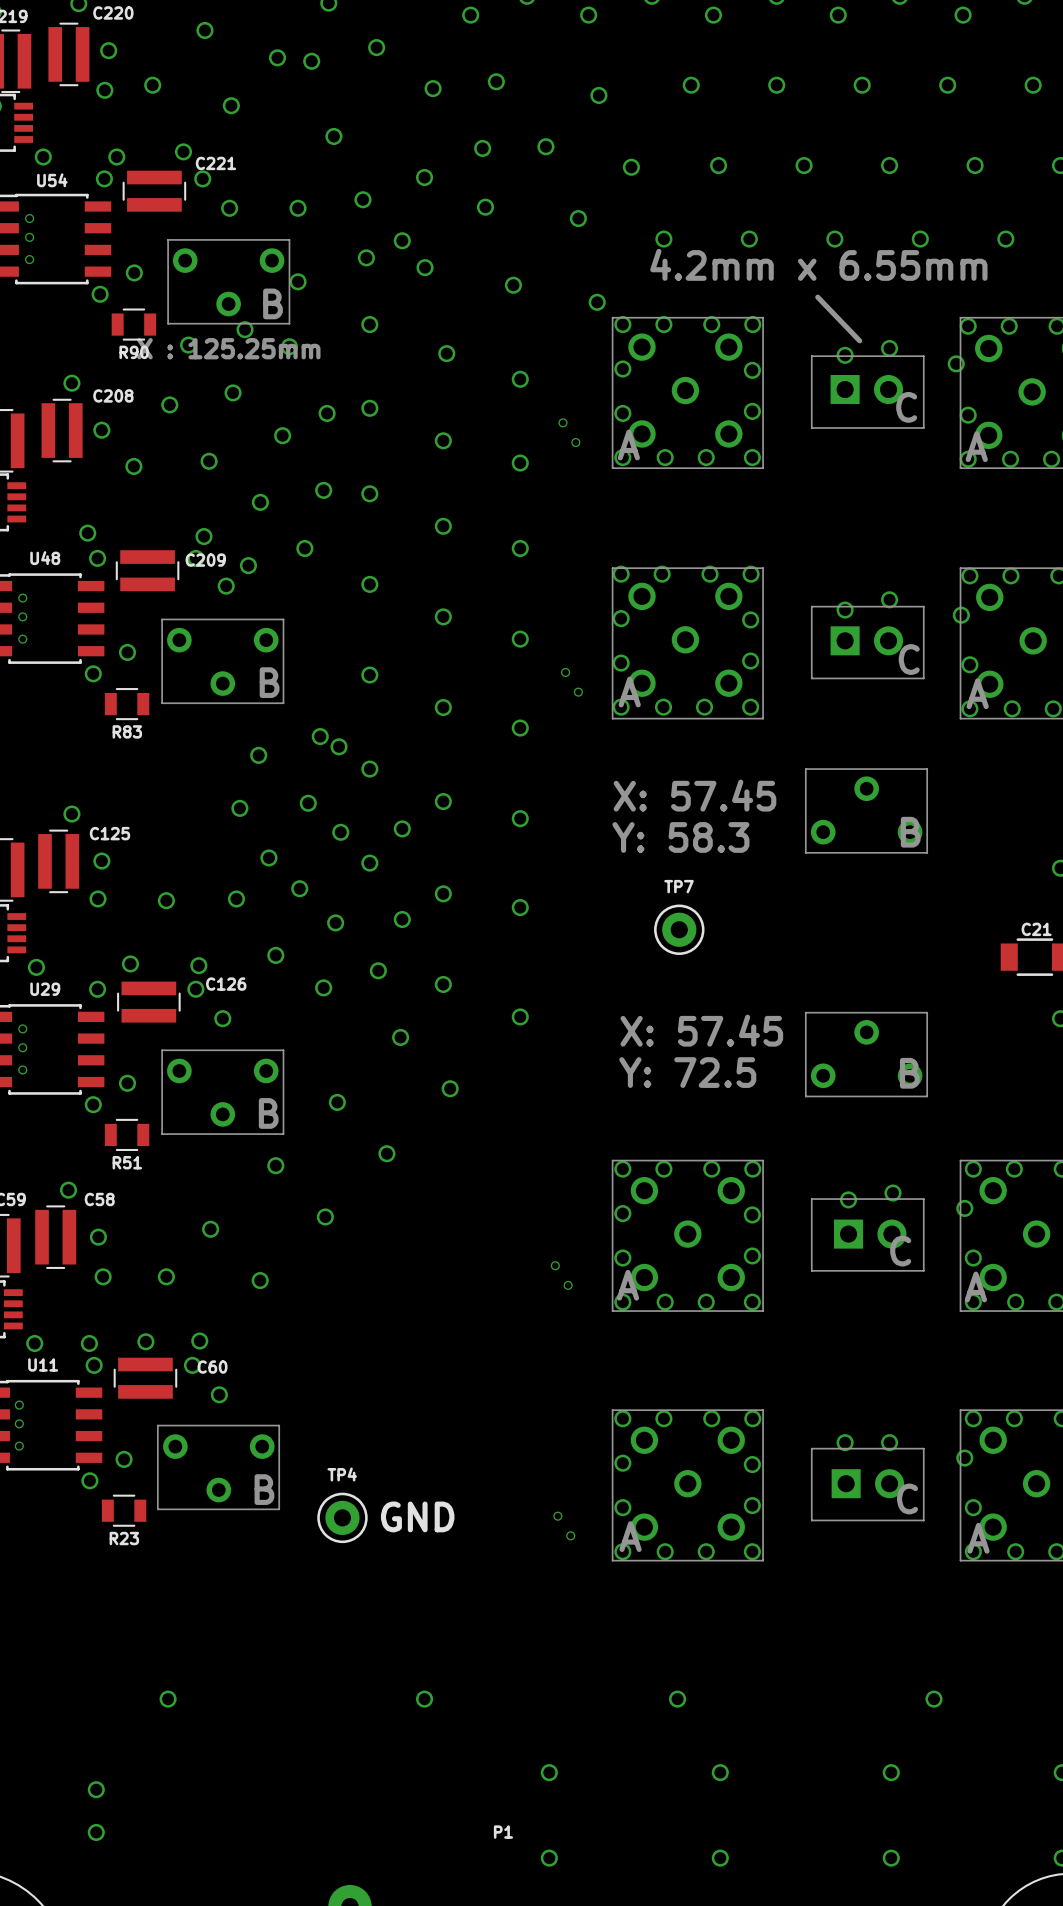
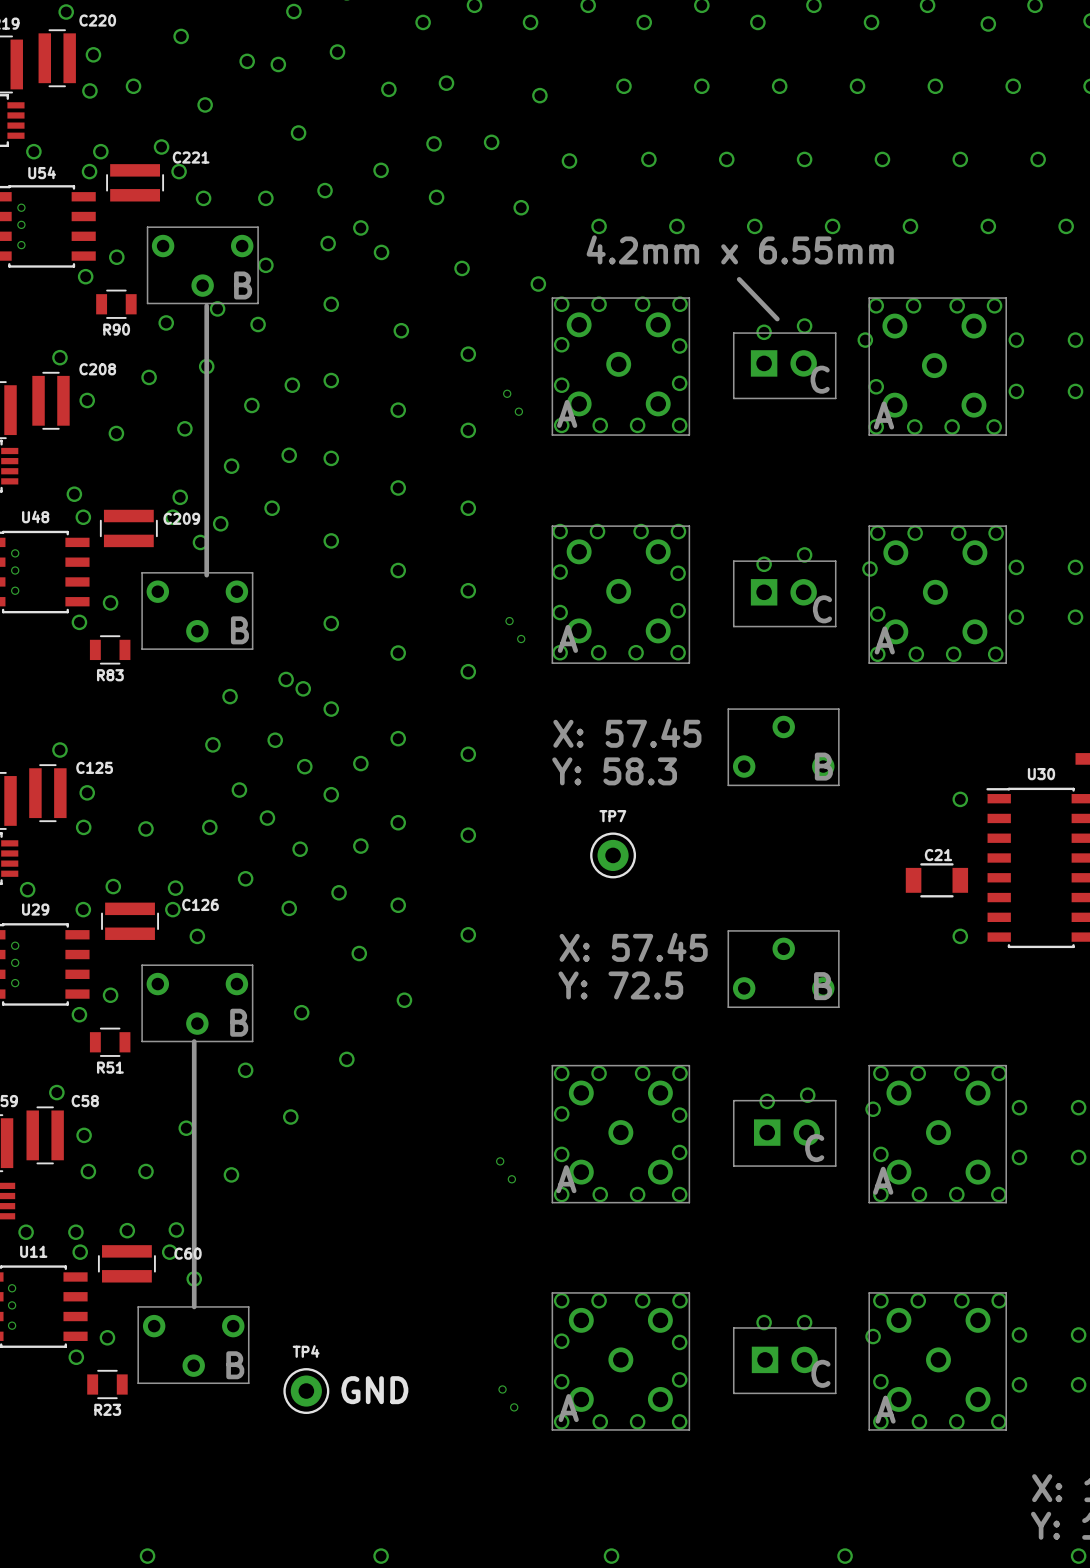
line: none -> (206, 305) (206, 575)
text: X : 125.25mm (228, 348) -> none
line: none -> (194, 1041) (194, 1306)

